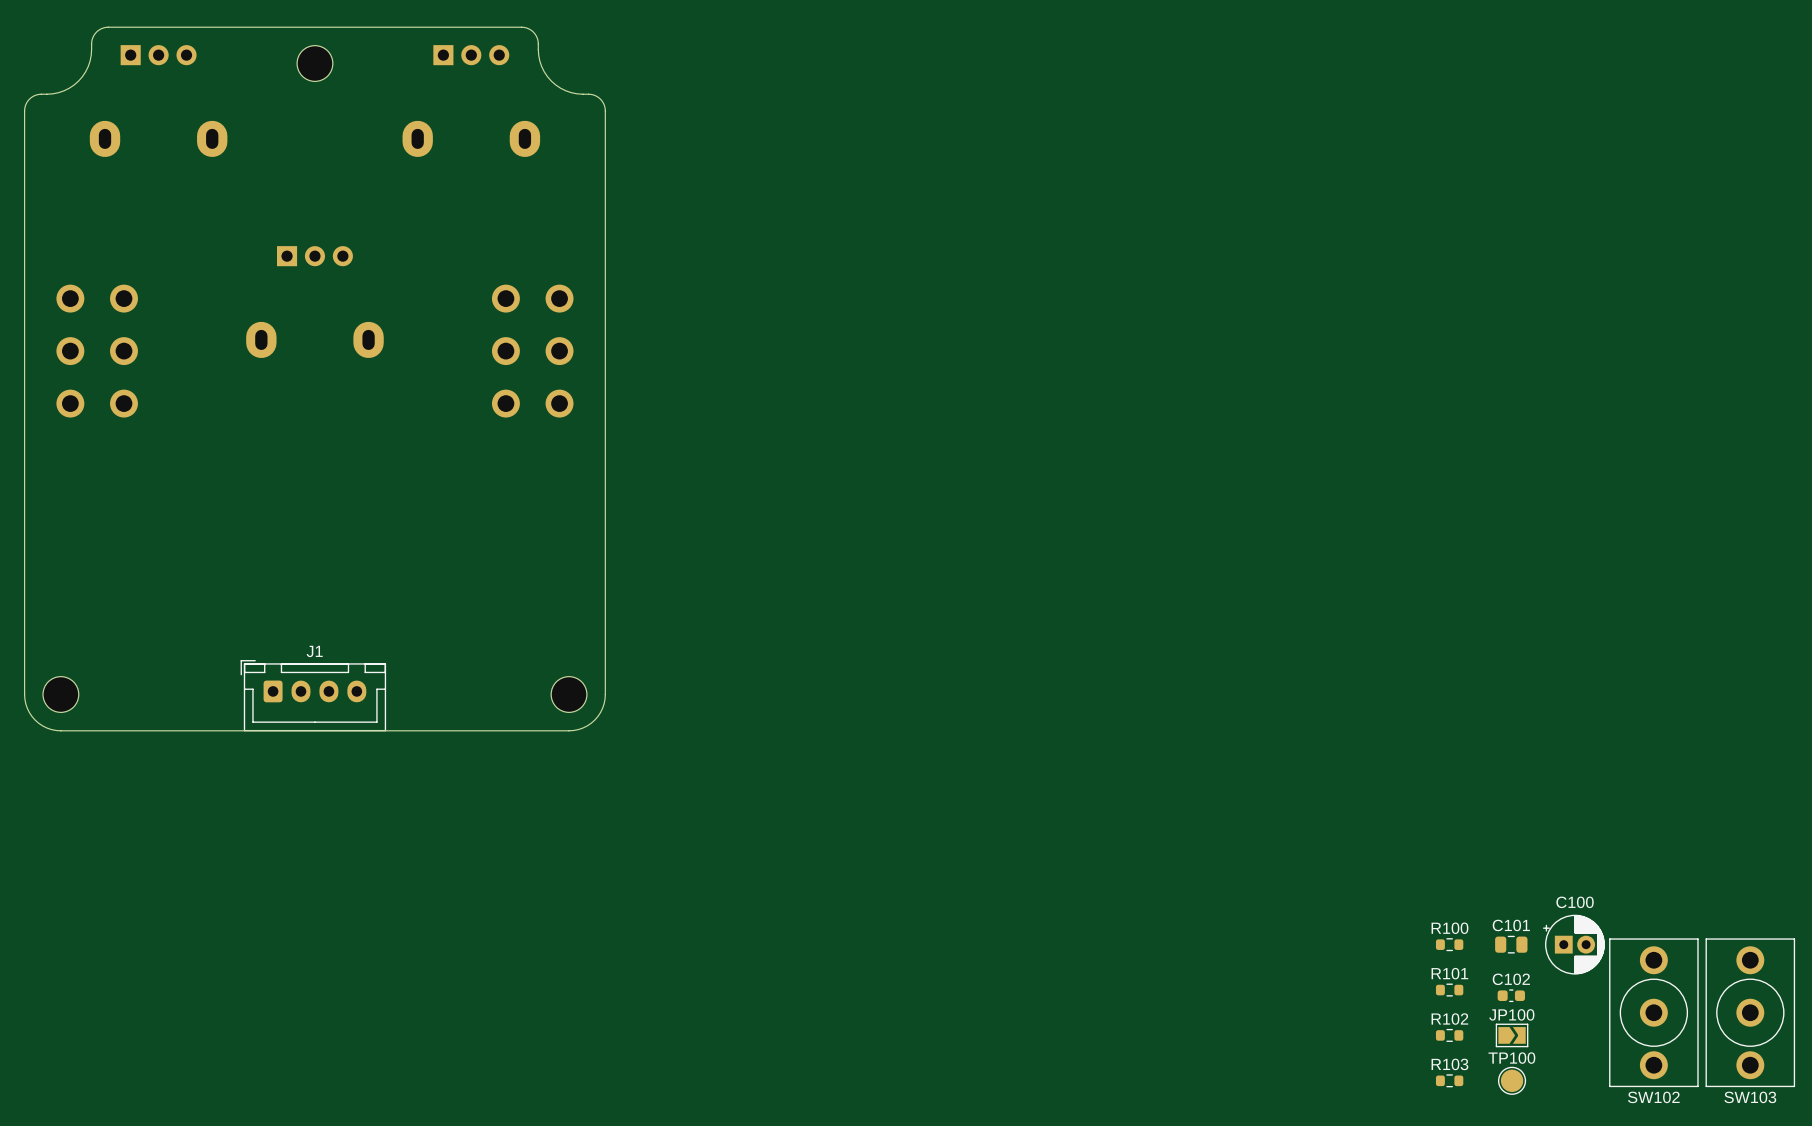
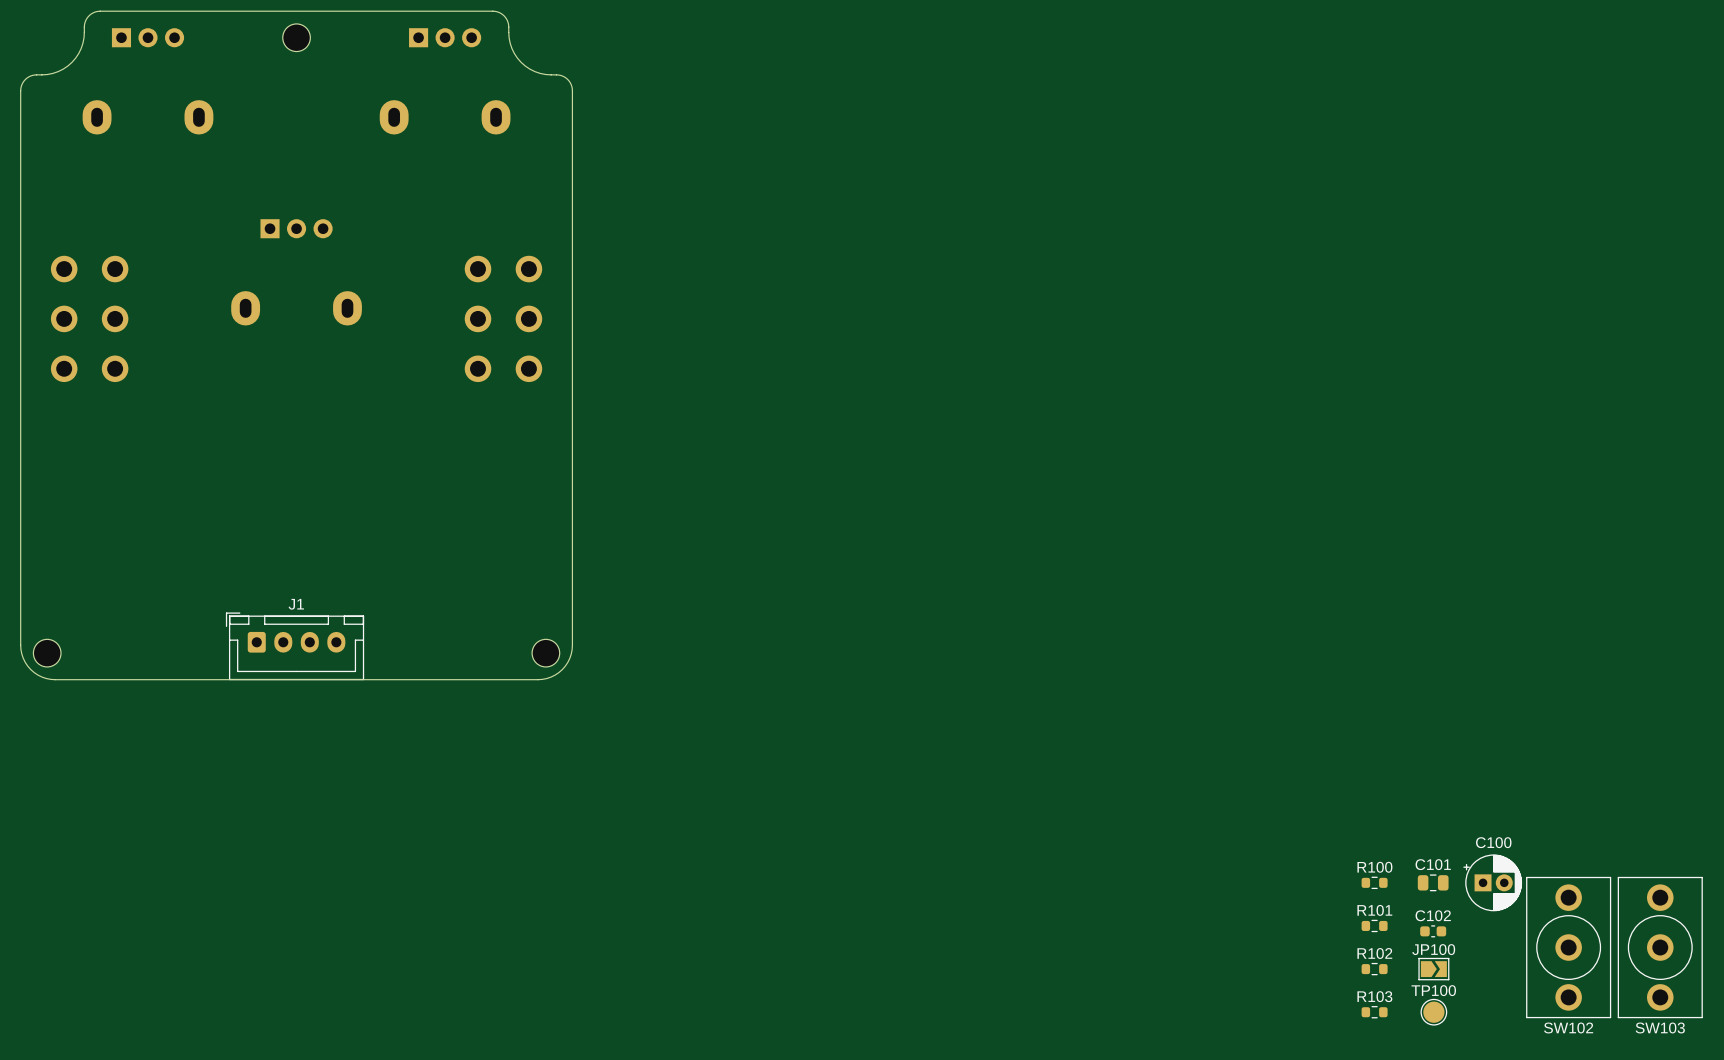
part footprint: [297, 45, 333, 82] -> [282, 23, 311, 52]
part: (60, 694) -> none
part: (569, 694) -> none
part: none -> (47, 653)
part: none -> (545, 653)

